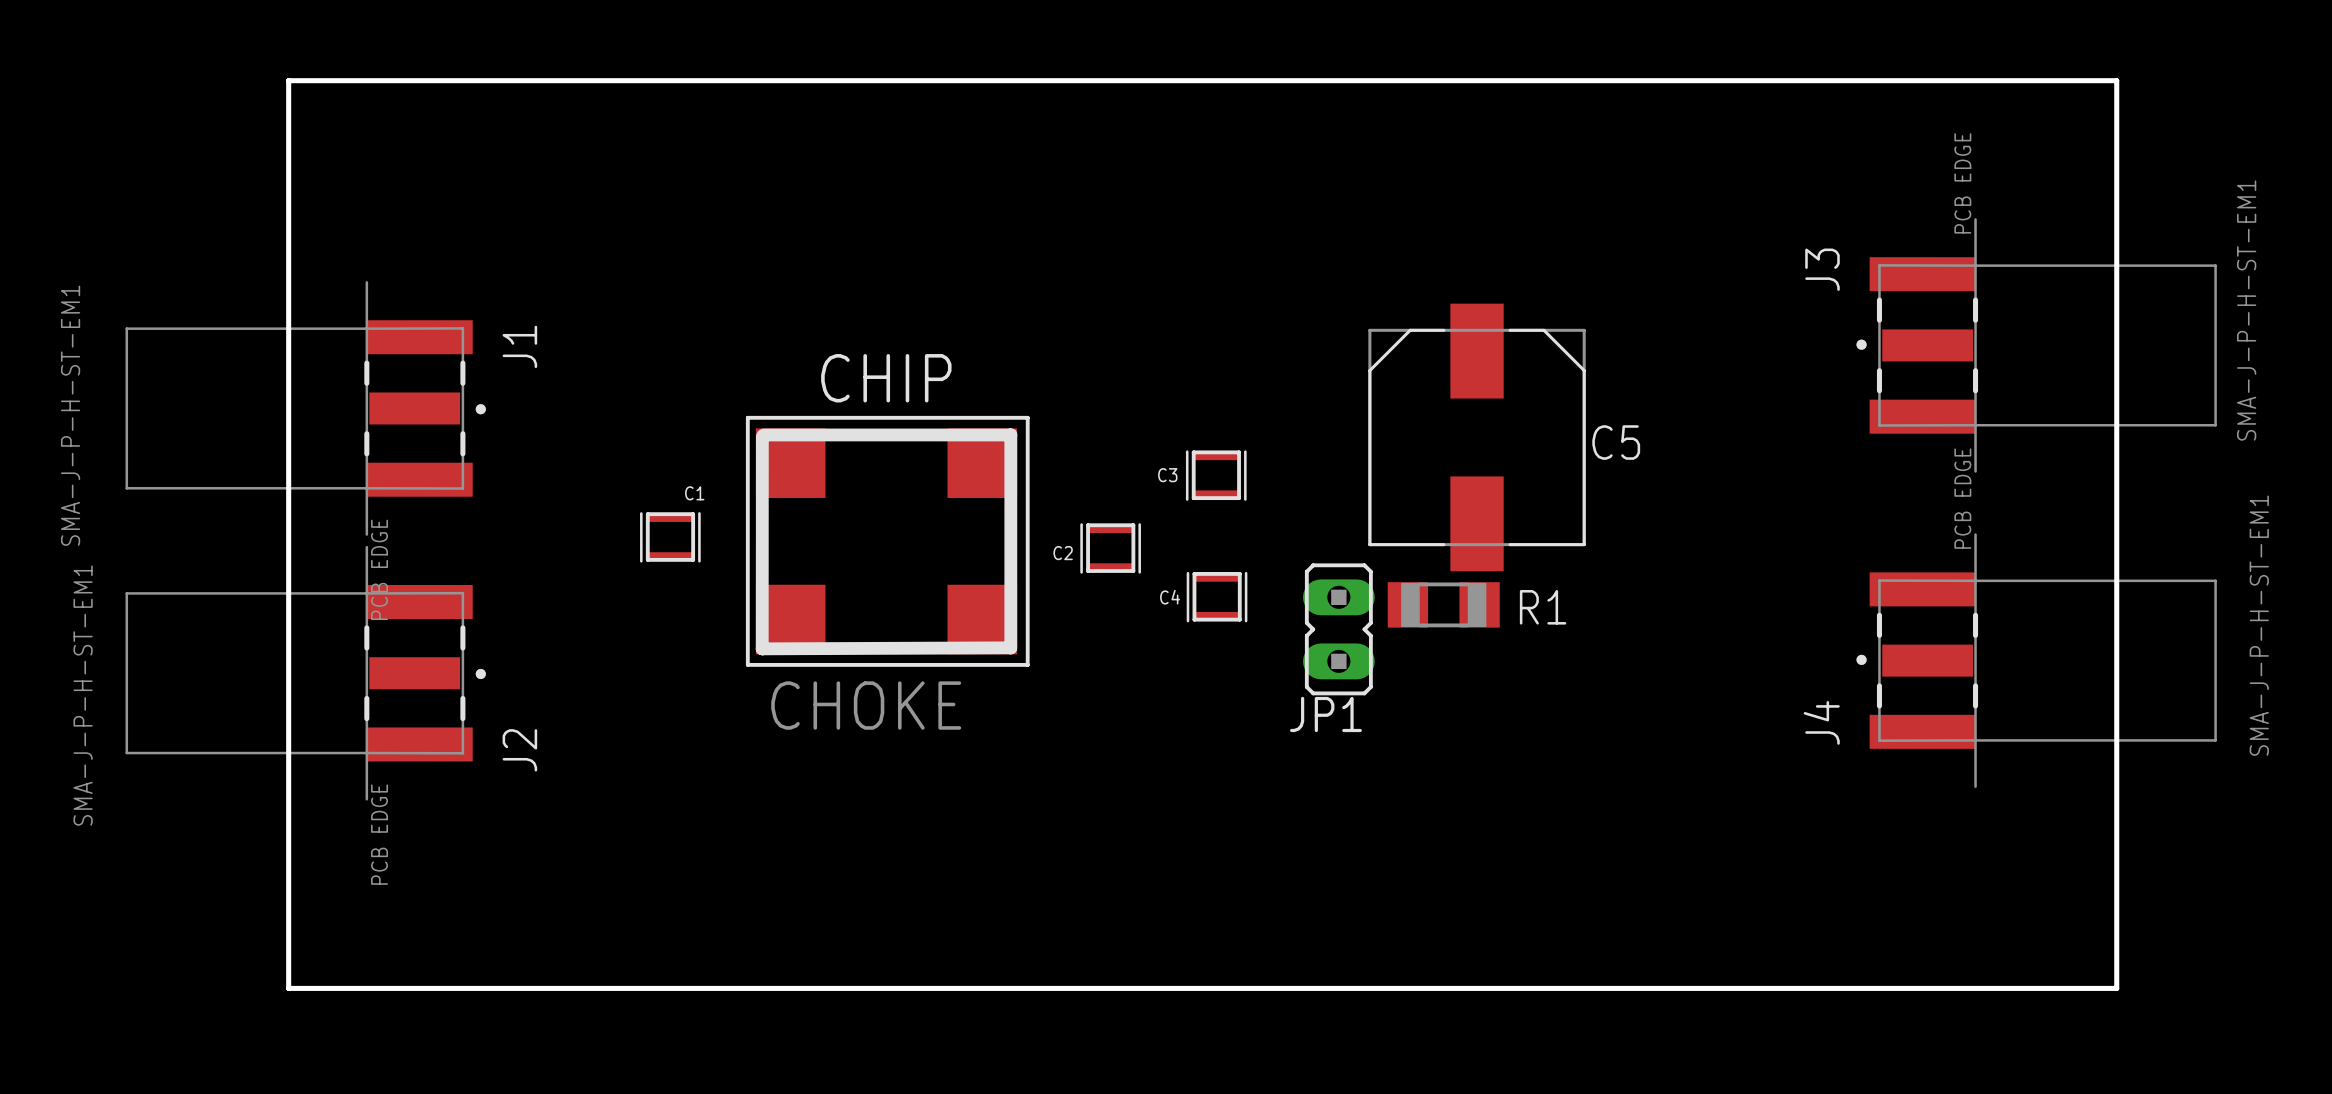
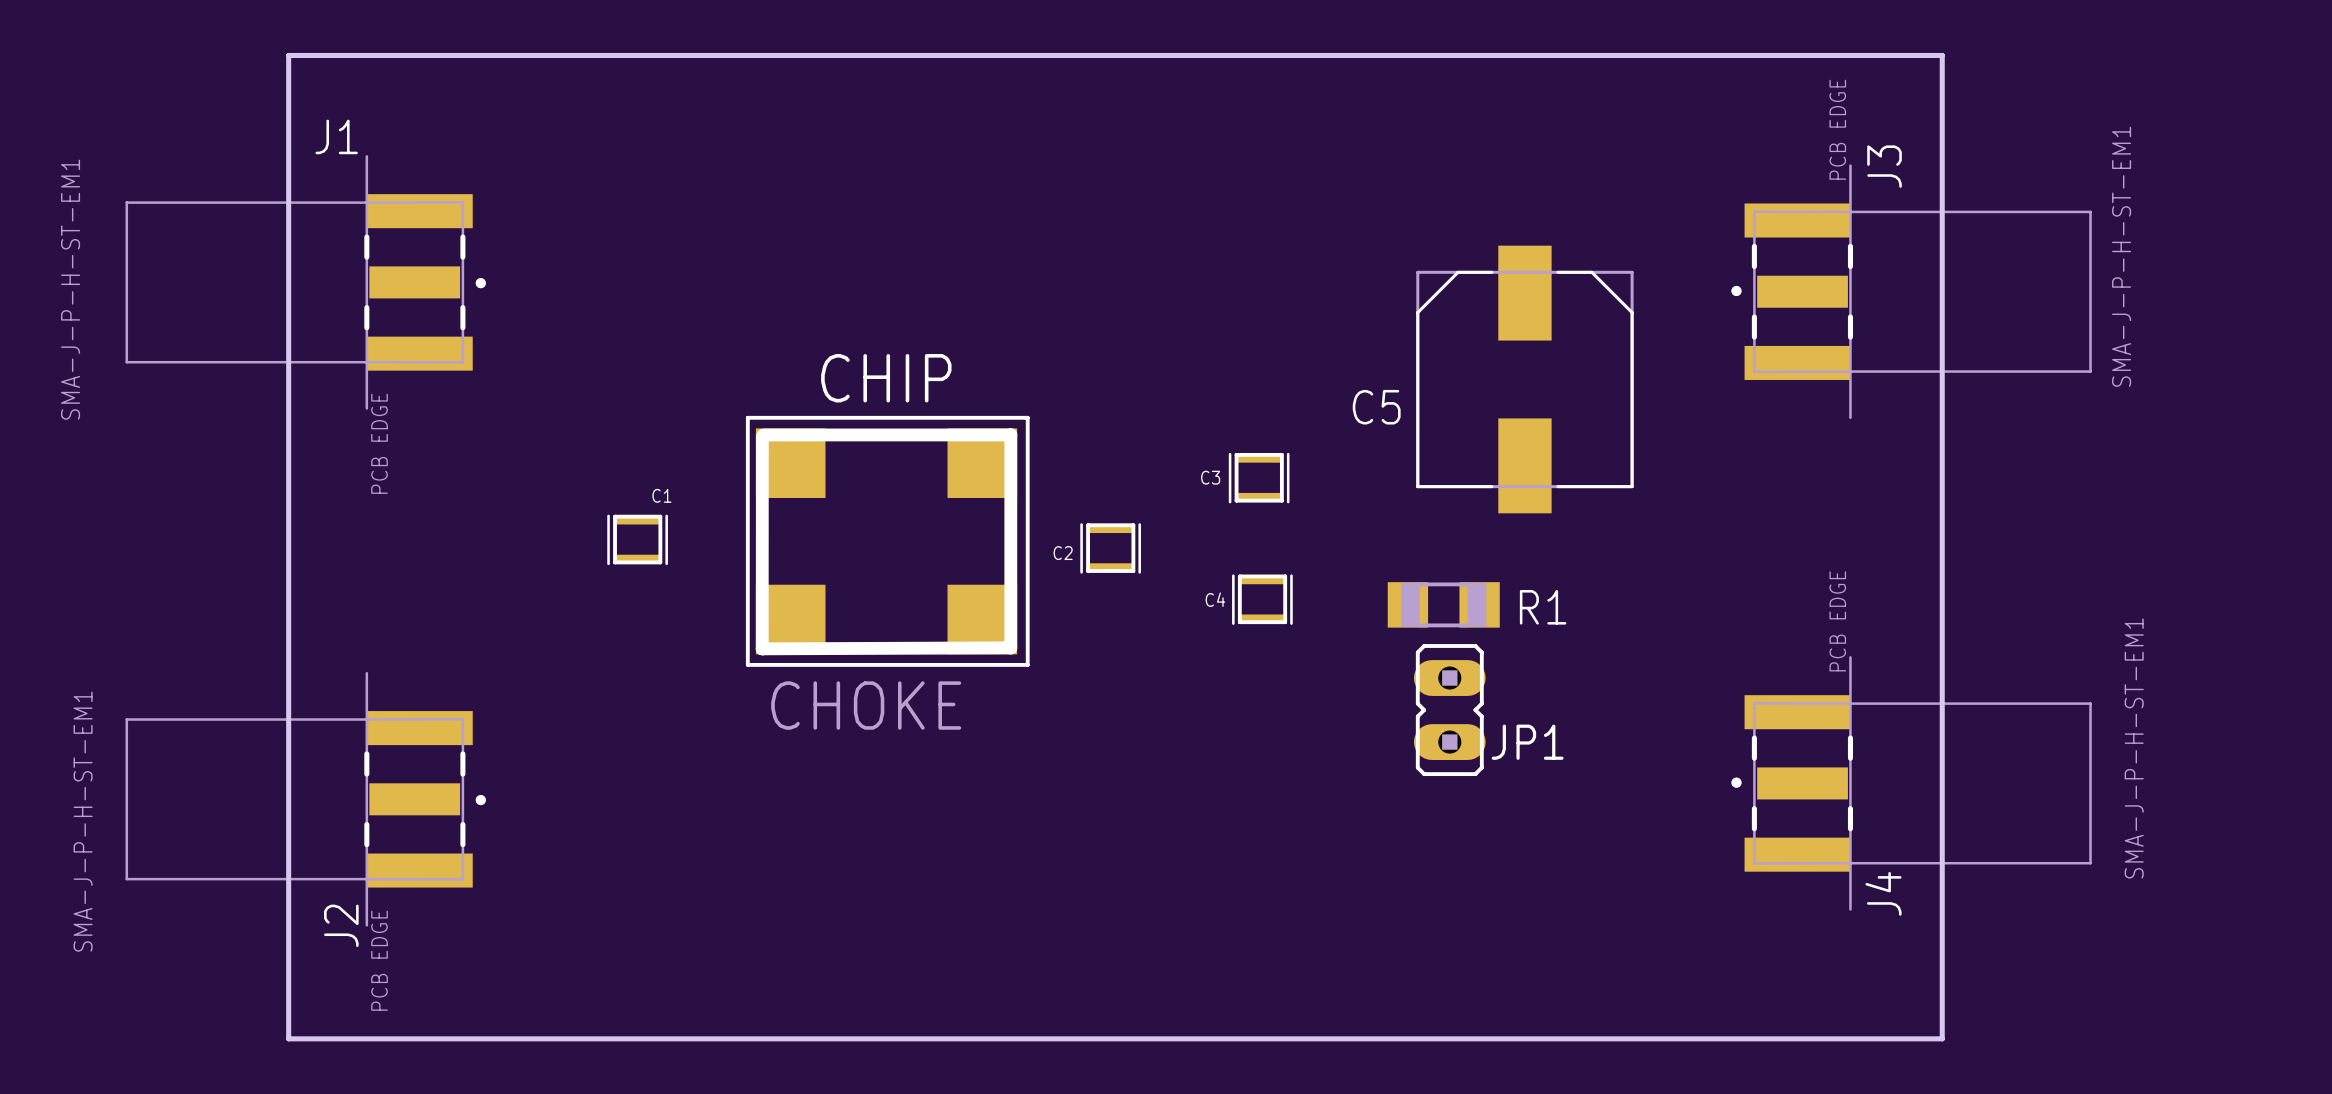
board edge: (288, 80) (2116, 80) (2116, 988) (288, 988) -> (288, 80) (288, 55) (1942, 55) (1942, 1038) (288, 1038) (288, 988)
J3 name position: J3 (1822, 269) -> J3 (1884, 166)
J3 position: (2036, 345) -> (1911, 291)
J1 name rotation: 0° (519, 346) -> 90° clockwise (336, 136)
J1 name position: J1 (519, 346) -> J1 (336, 136)
J1 position: (305, 408) -> (305, 282)
C5 position: (1477, 437) -> (1524, 379)
C5 name position: C5 (1616, 442) -> C5 (1376, 407)
C3 position: (1216, 475) -> (1259, 478)
C1 position: (670, 537) -> (637, 539)
C4 position: (1217, 597) -> (1262, 599)
JP1 position: (1338, 629) -> (1449, 710)
J4 position: (2036, 660) -> (1911, 783)
J2 position: (305, 673) -> (305, 799)
JP1 name position: JP1 (1325, 714) -> JP1 (1527, 742)
J4 name position: J4 (1821, 722) -> J4 (1883, 893)
J2 name position: J2 (519, 750) -> J2 (341, 925)

